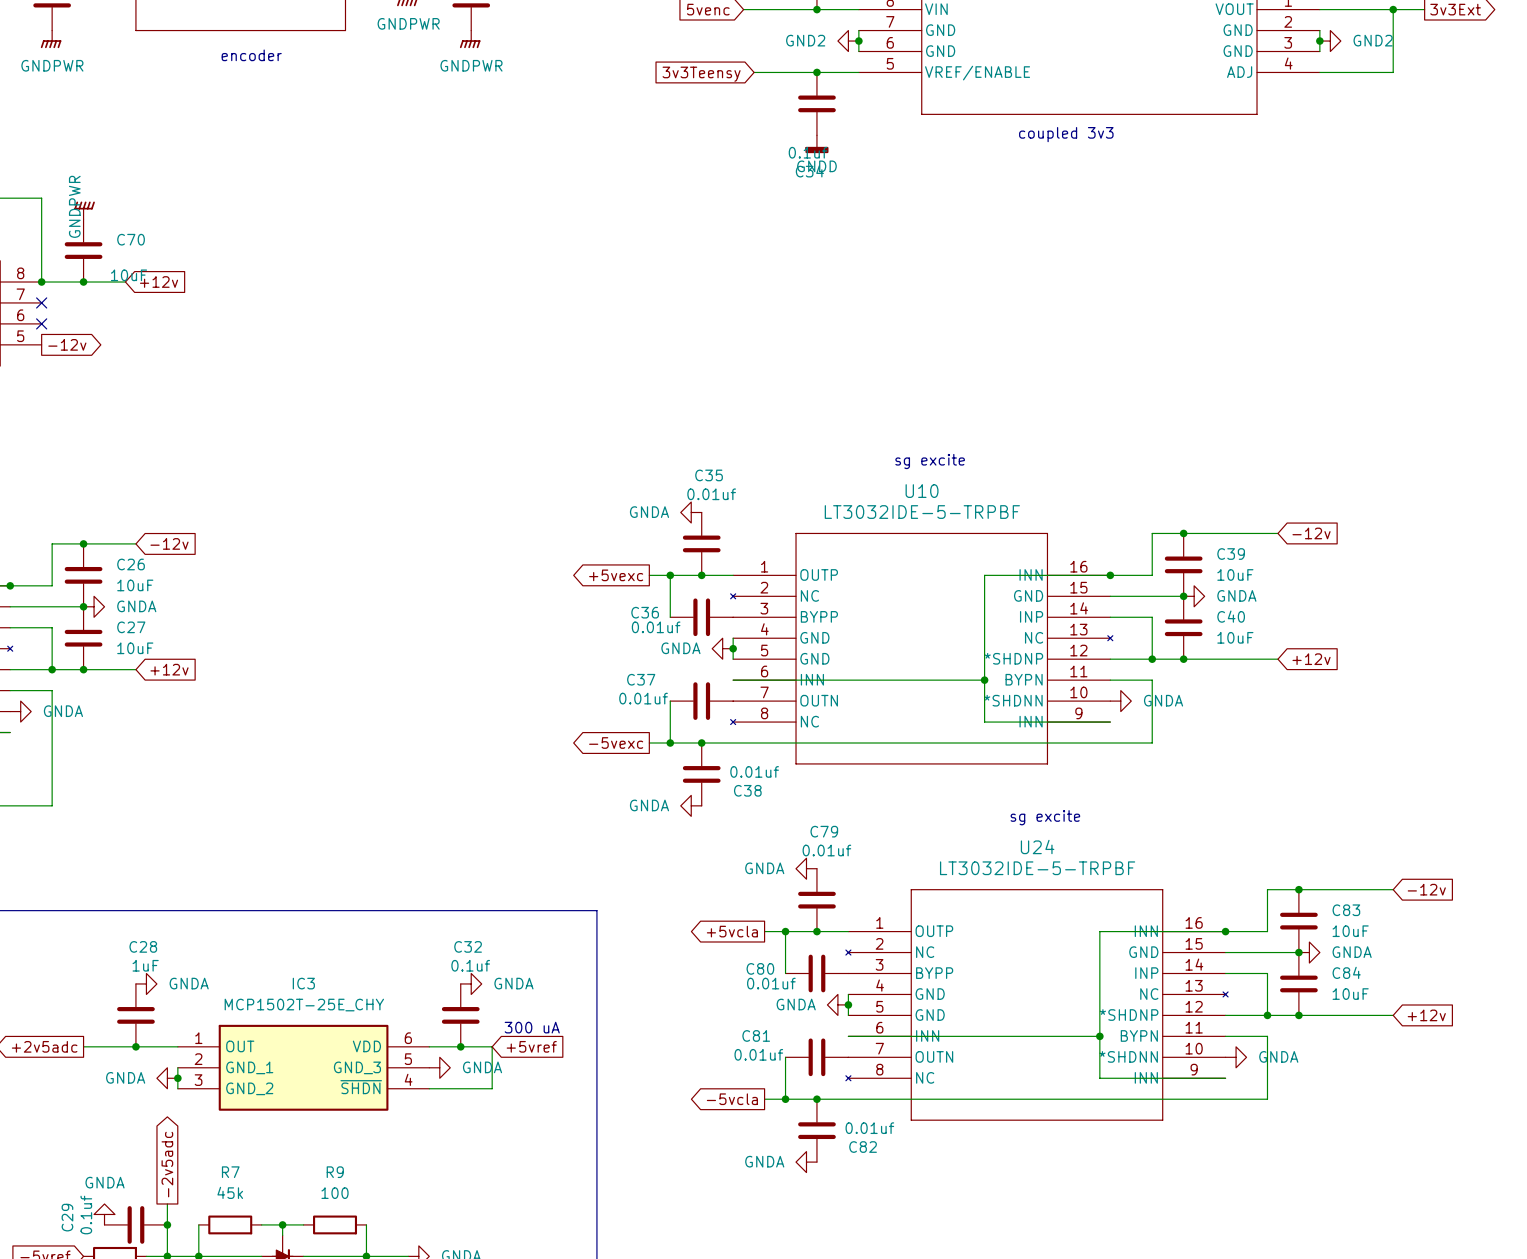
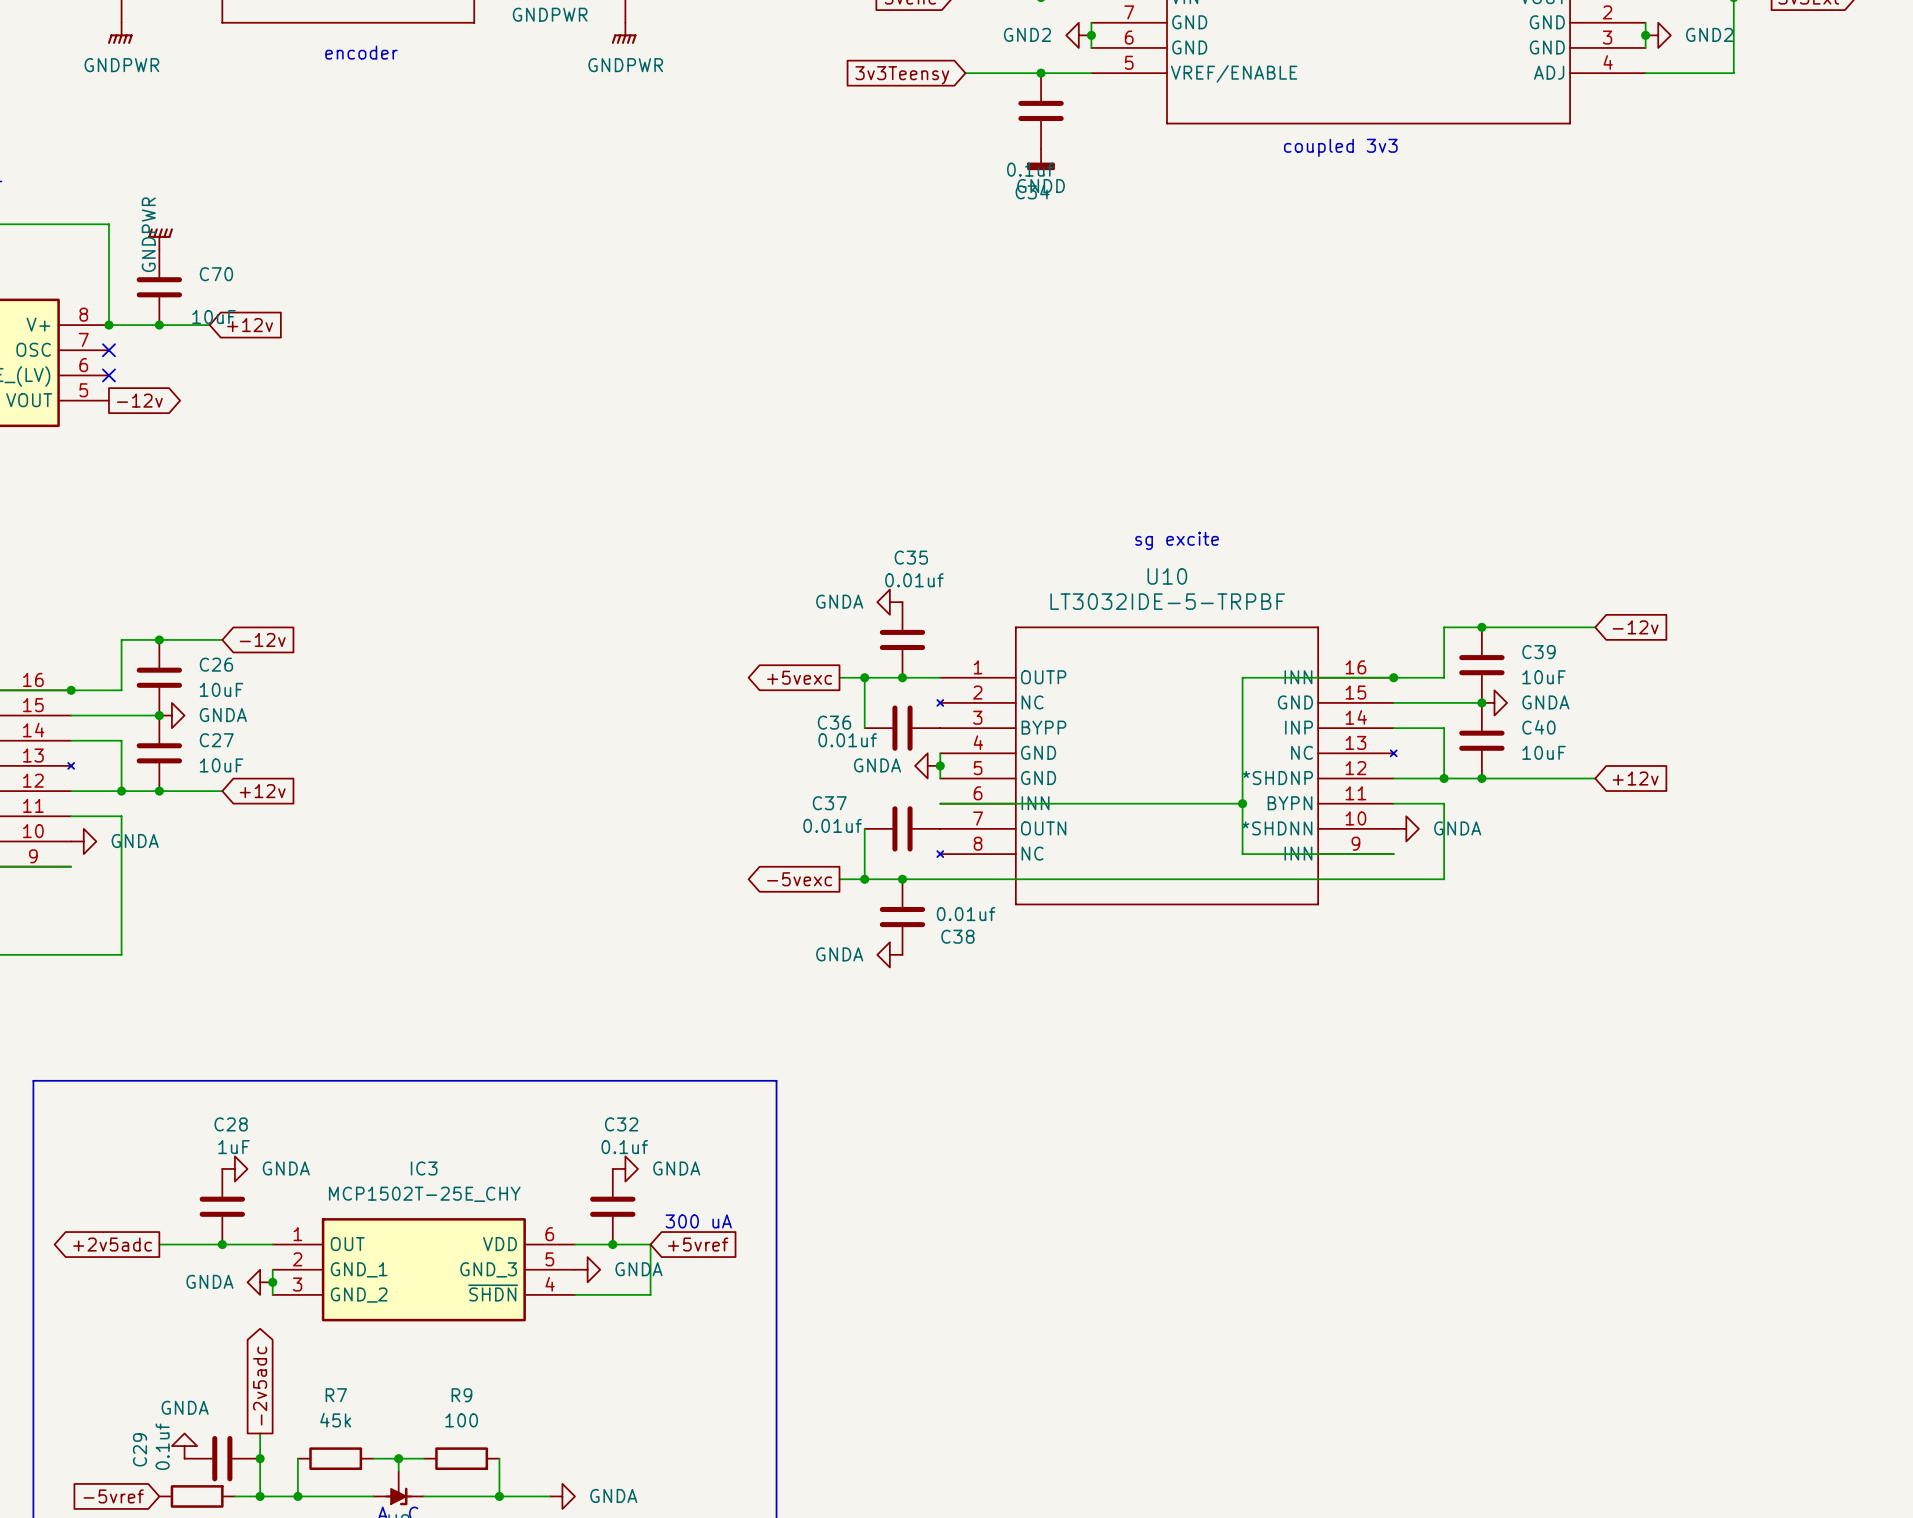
text: sg excite (1045, 817) -> none
power symbol: GNDA (806, 868) -> none
junction: (1298, 889) -> none
wire: (1393, 889) (1267, 889) (1267, 931) (1099, 931) (1099, 1078) (1225, 1078) -> none
global label: -12v (1426, 889) -> none
C79: 0.01uf (816, 900) -> none
C83: 10uF (1298, 921) -> none
global label: +5vcla (732, 931) -> none
wire: (764, 931) (848, 931) -> none
wire: (785, 931) (785, 973) -> none
junction: (785, 931) -> none
junction: (816, 931) -> none
junction: (1225, 931) -> none
wire: (1225, 952) (1298, 952) -> none
junction: (1298, 952) -> none
power symbol: GNDA (1309, 952) -> none
C80: 0.01uf (816, 973) -> none
wire: (1225, 973) (1267, 973) (1267, 1015) -> none
C84: 10uF (1298, 983) -> none
wire: (848, 994) (848, 1015) -> none
power symbol: GNDA (837, 1004) -> none
junction: (848, 1004) -> none
U24: LT3032IDE-5-TRPBF (1036, 1004) -> none
wire: (1225, 1015) (1393, 1015) -> none
junction: (1267, 1015) -> none
junction: (1298, 1015) -> none
global label: +12v (1426, 1015) -> none
wire: (848, 1036) (1099, 1036) -> none
junction: (1099, 1036) -> none
wire: (1225, 1036) (1267, 1036) (1267, 1099) (764, 1099) -> none
wire: (785, 1057) (785, 1099) -> none
C81: 0.01uf (816, 1057) -> none
power symbol: GNDA (1236, 1057) -> none
global label: -5vcla (732, 1099) -> none
junction: (785, 1099) -> none
junction: (816, 1099) -> none
C82: 0.01uf (816, 1130) -> none
power symbol: GNDA (806, 1162) -> none

